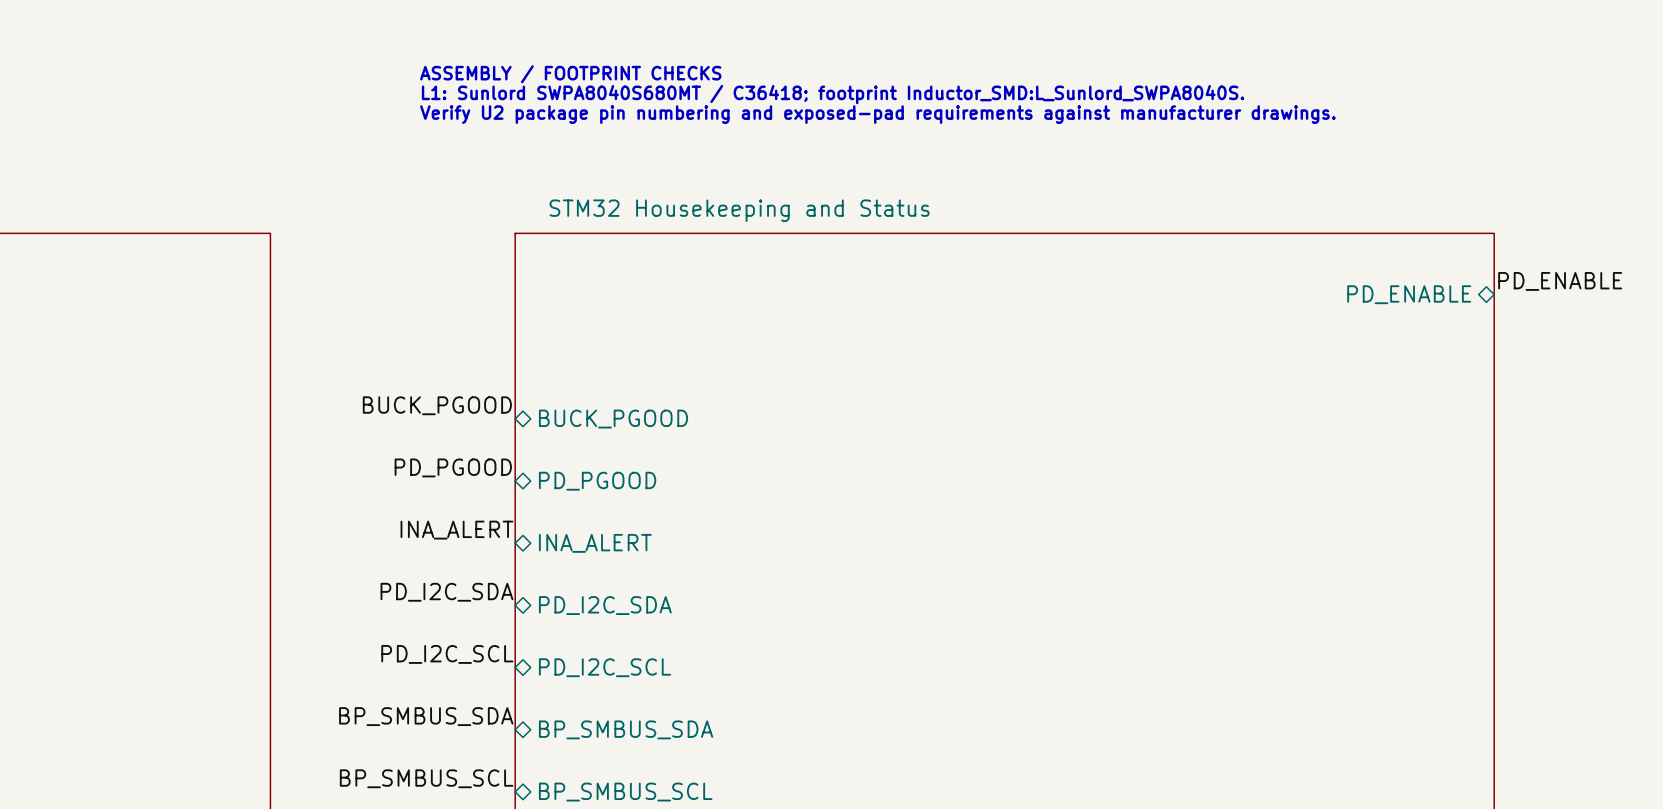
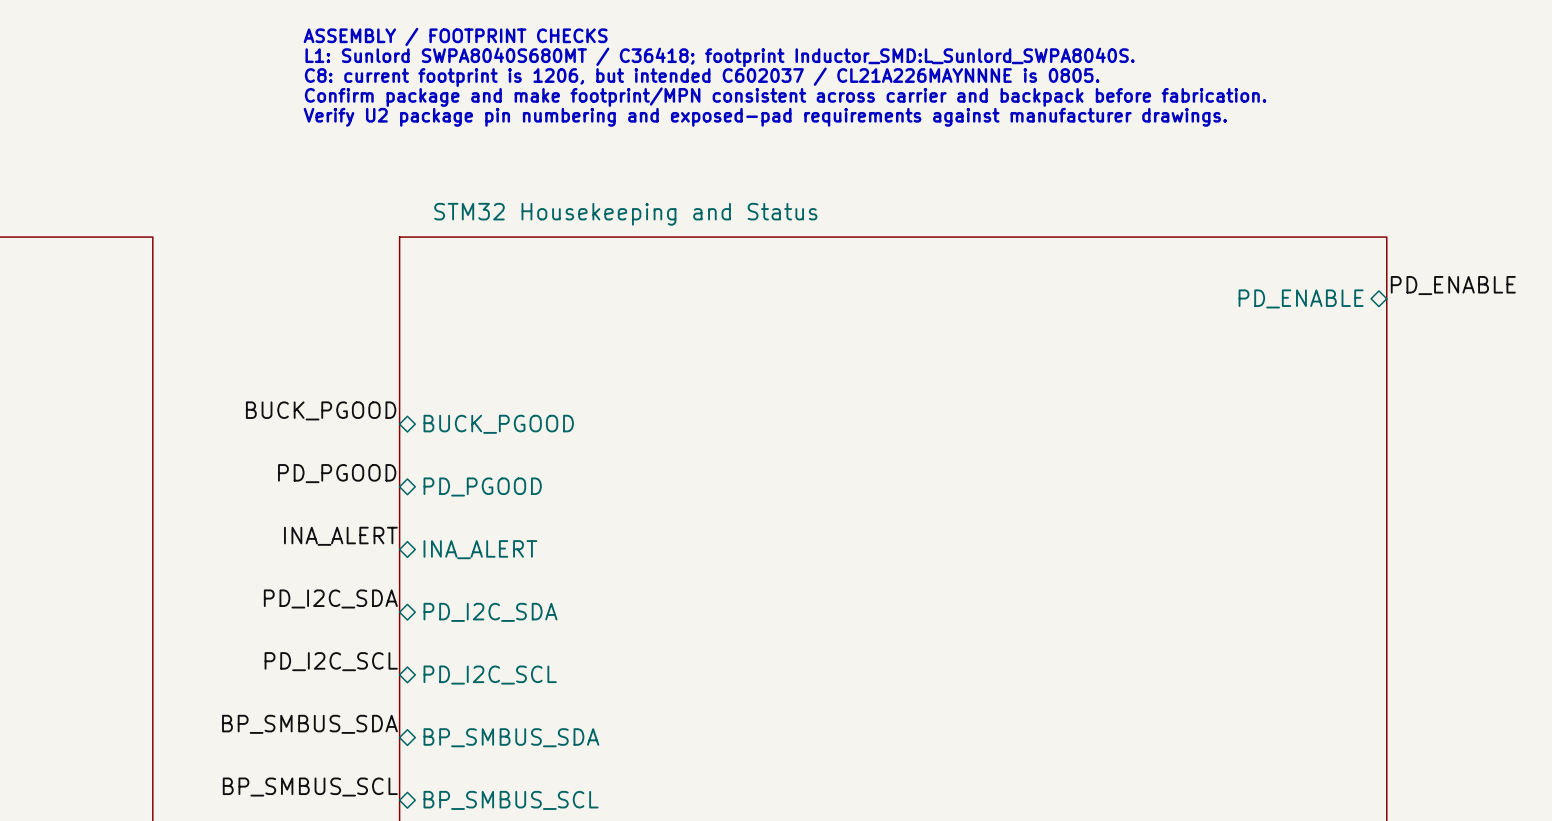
text: none -> ASSEMBLY / FOOTPRINT CHECKS (455, 36)
text: none -> L1: Sunlord SWPA8040S680MT / C36418; footprint Inductor_SMD:L_Sunlord_SWPA8040S. (720, 57)
text: ASSEMBLY / FOOTPRINT CHECKS (570, 74) -> C8: current footprint is 1206, but intended C602037 / CL21A226MAYNNNE is 0805. (702, 77)
text: L1: Sunlord SWPA8040S680MT / C36418; footprint Inductor_SMD:L_Sunlord_SWPA8040S. (833, 94) -> Confirm package and make footprint/MPN consistent across carrier and backpack before fabrication. (785, 97)

